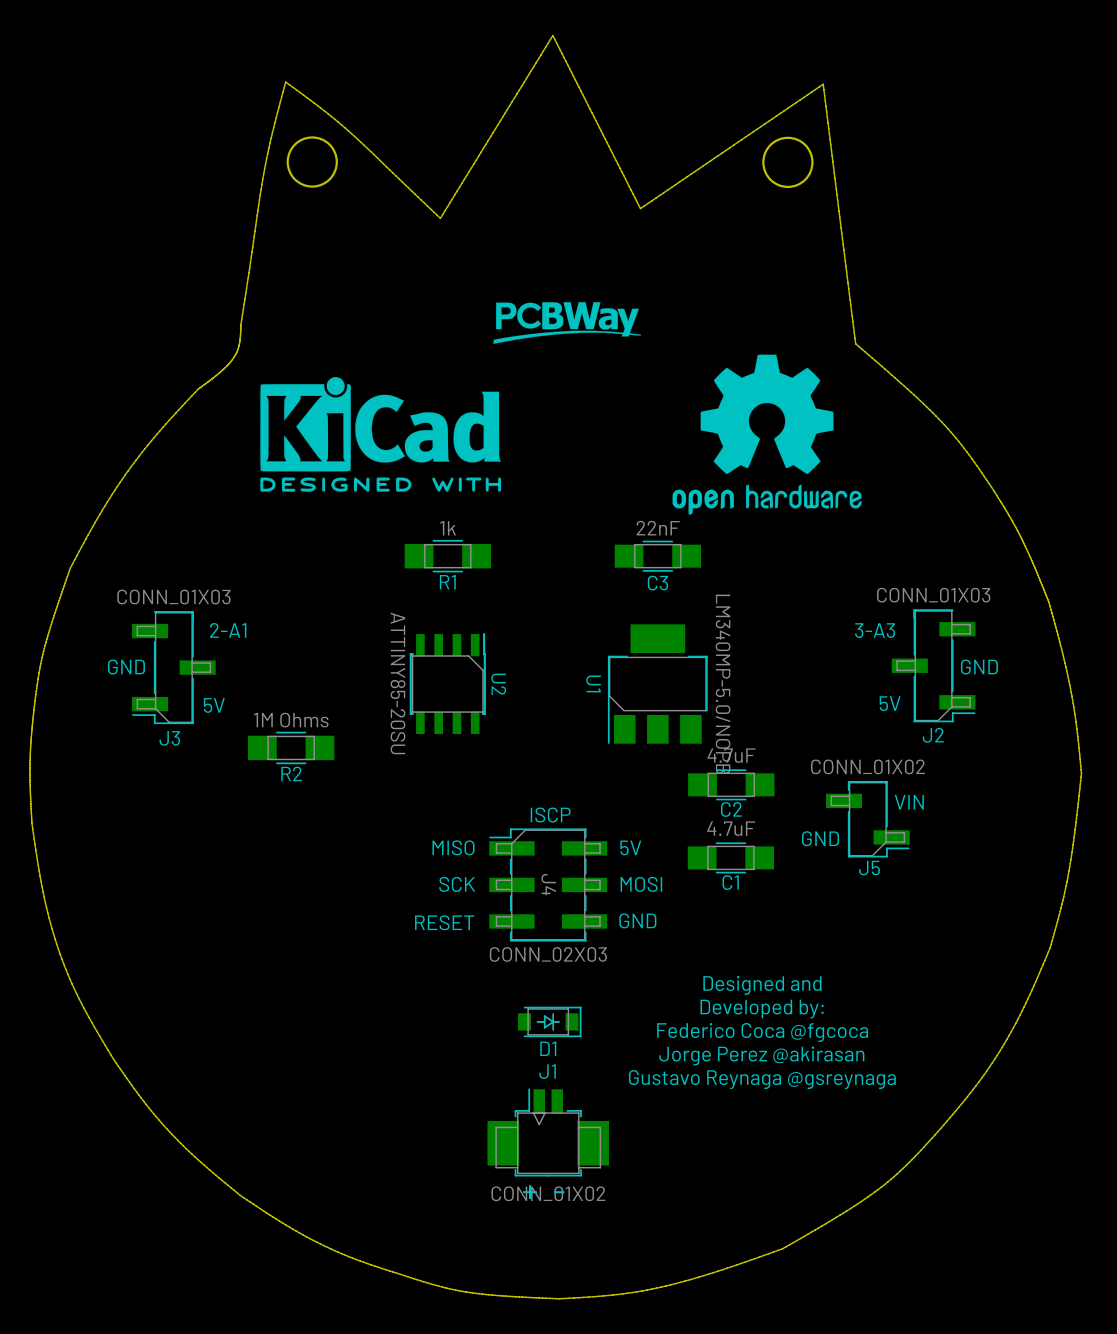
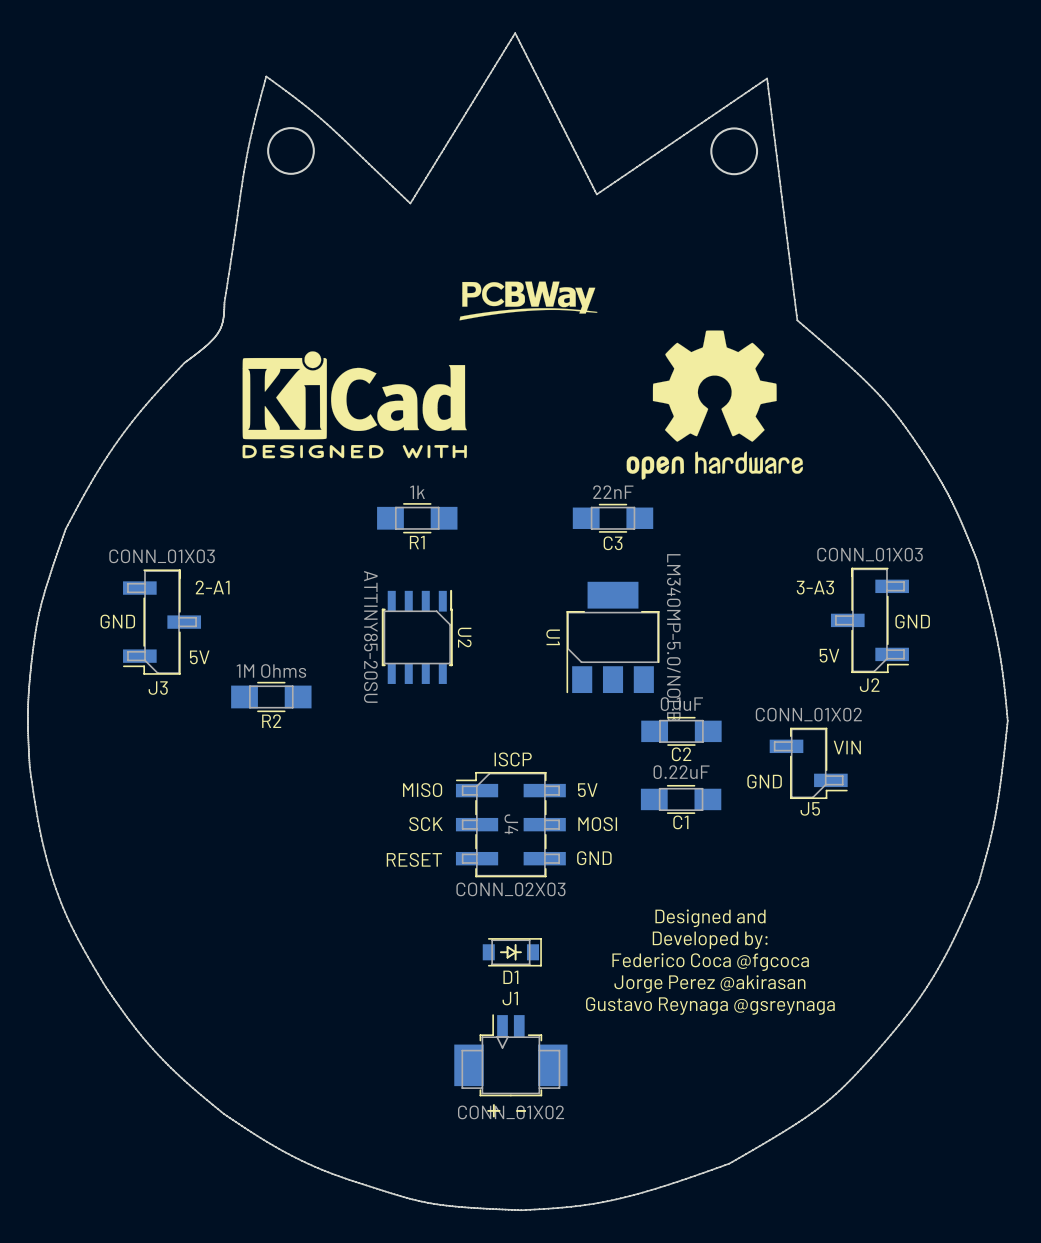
C2 value: 4.7uF (731, 755) -> 0.1uF (681, 704)
C1 value: 4.7uF (731, 828) -> 0.22uF (681, 772)

